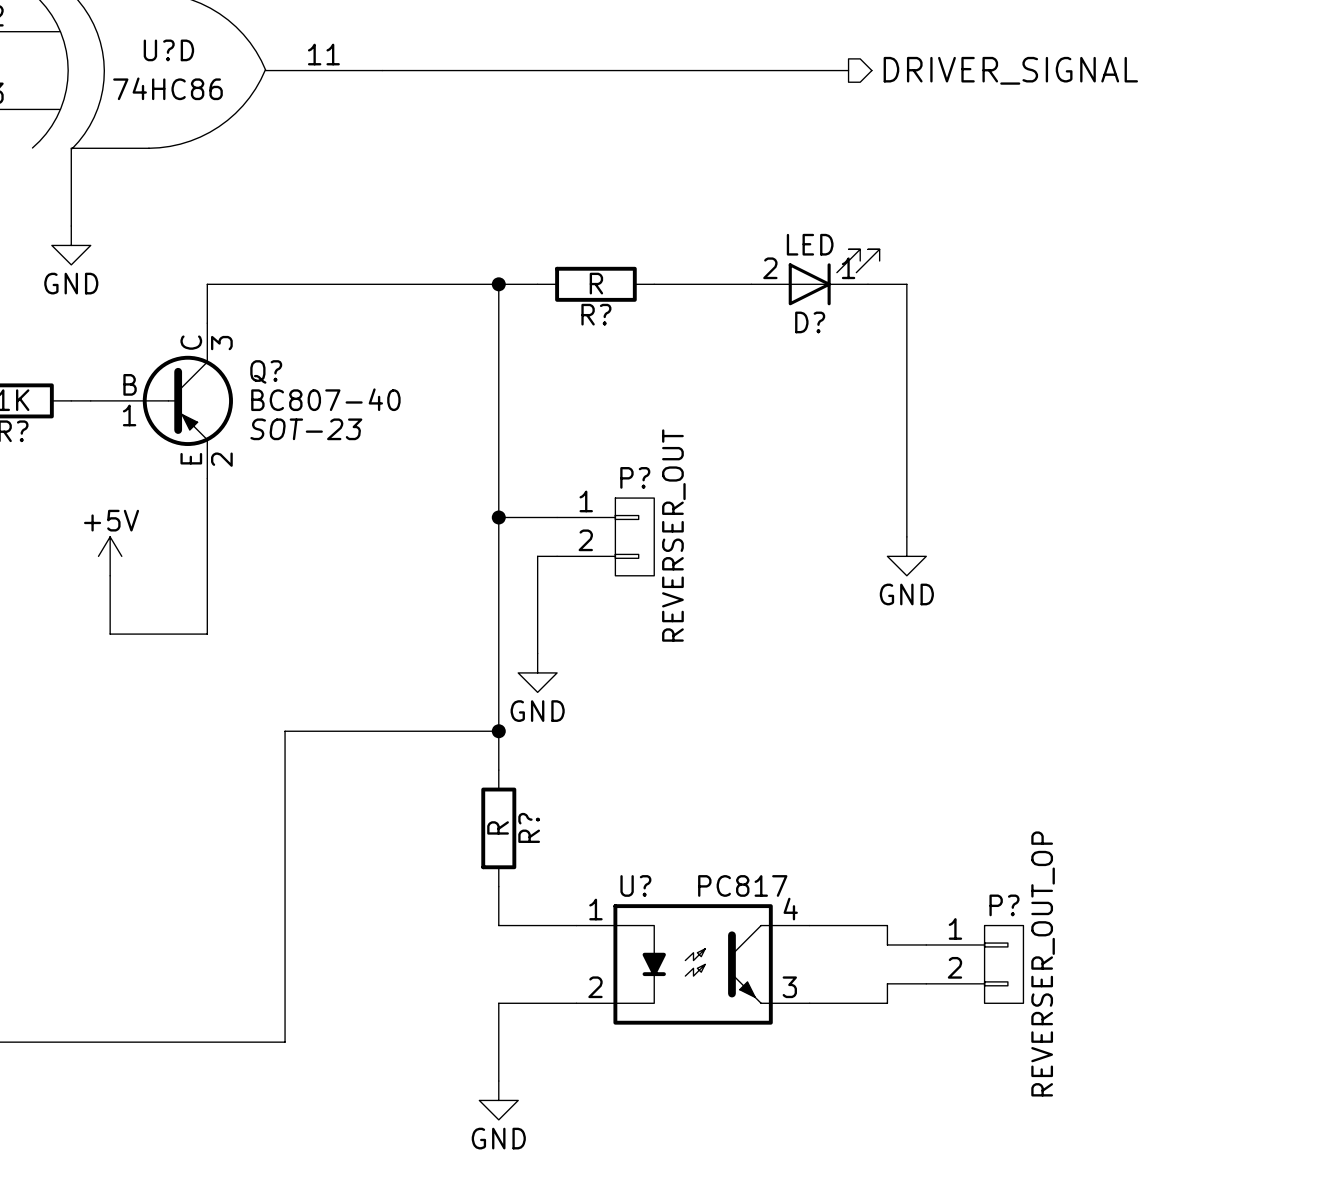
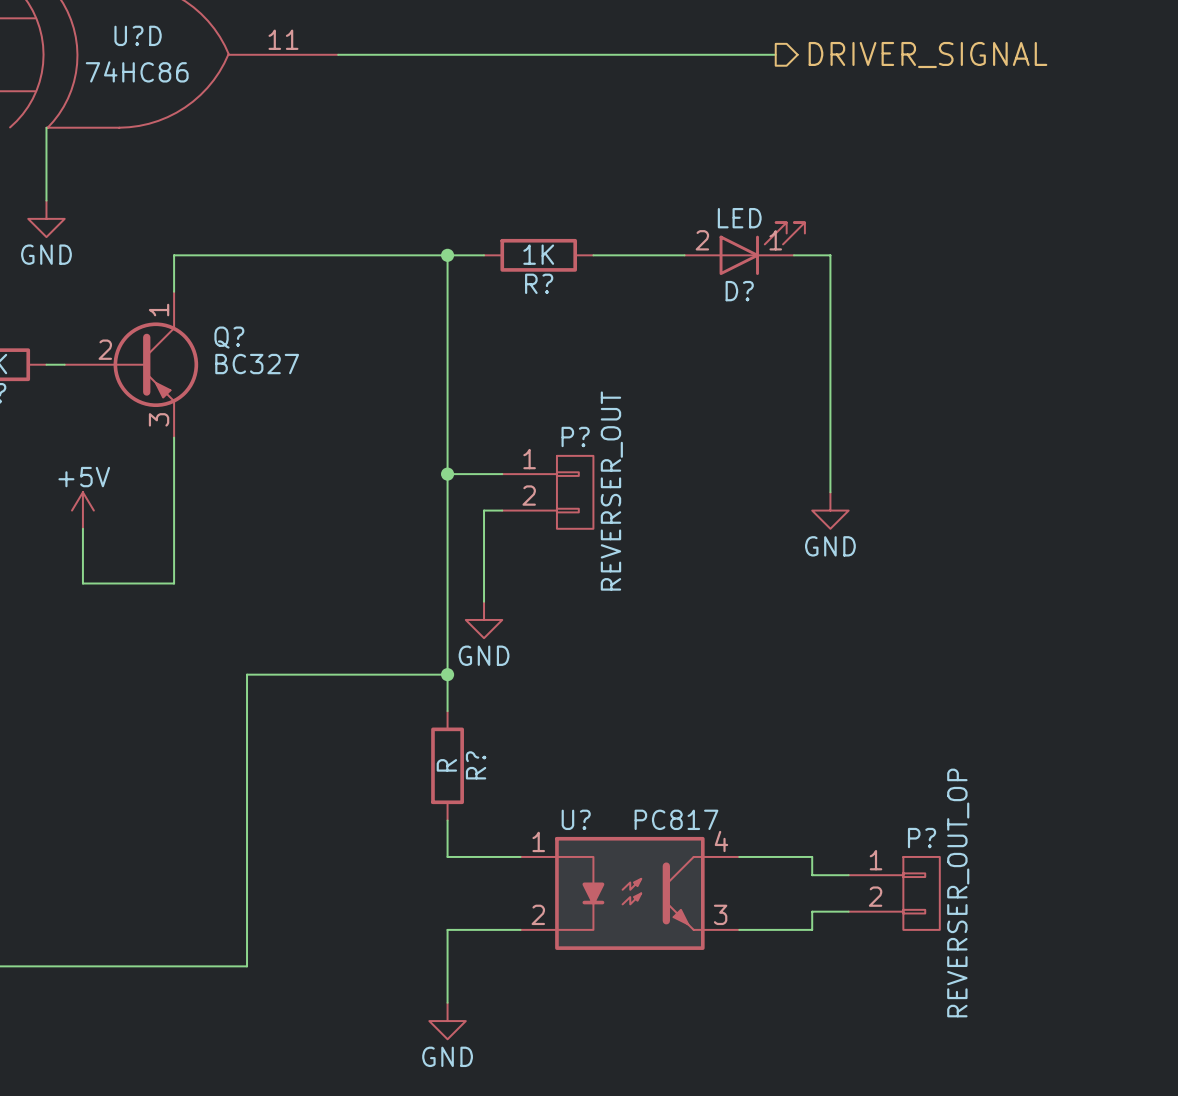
R? value: R (596, 283) -> 1K (538, 254)
Q? symbol: [90, 323, 233, 479] -> [64, 291, 199, 438]
Q? value: BC807-40 (325, 399) -> BC327 (257, 364)
Q? text: SOT-23 (306, 429) -> none

